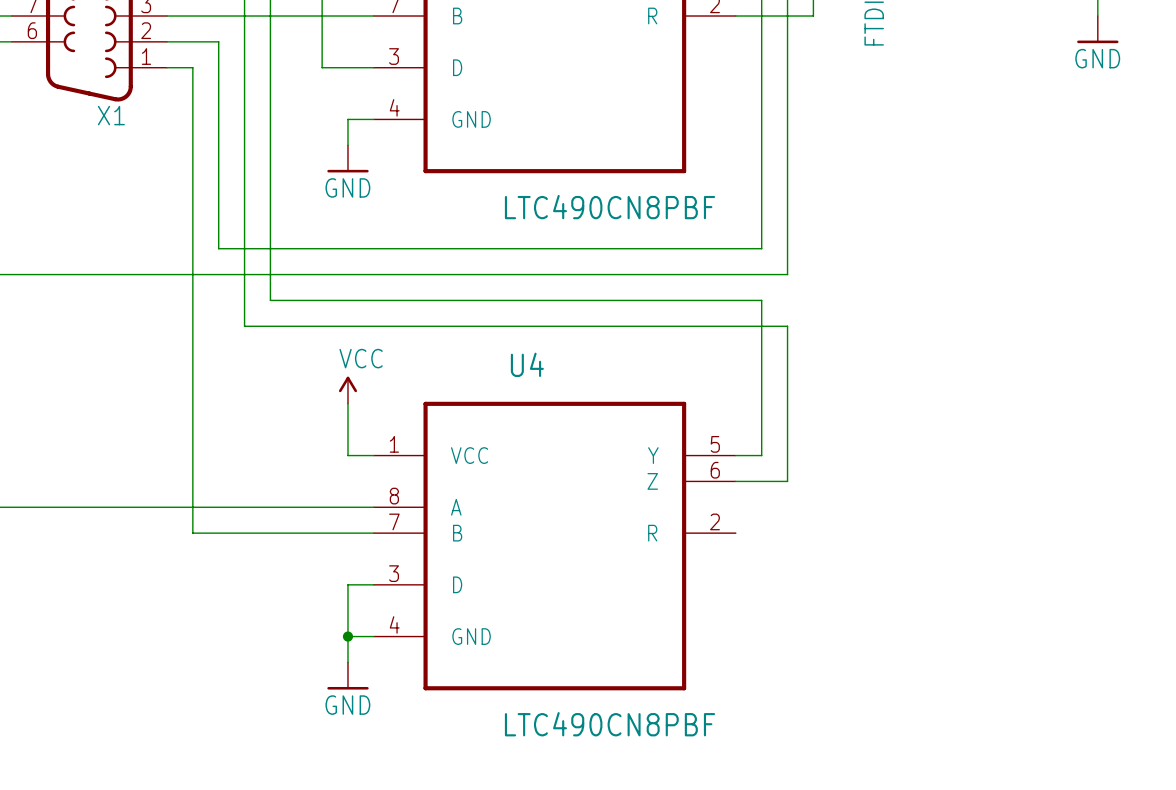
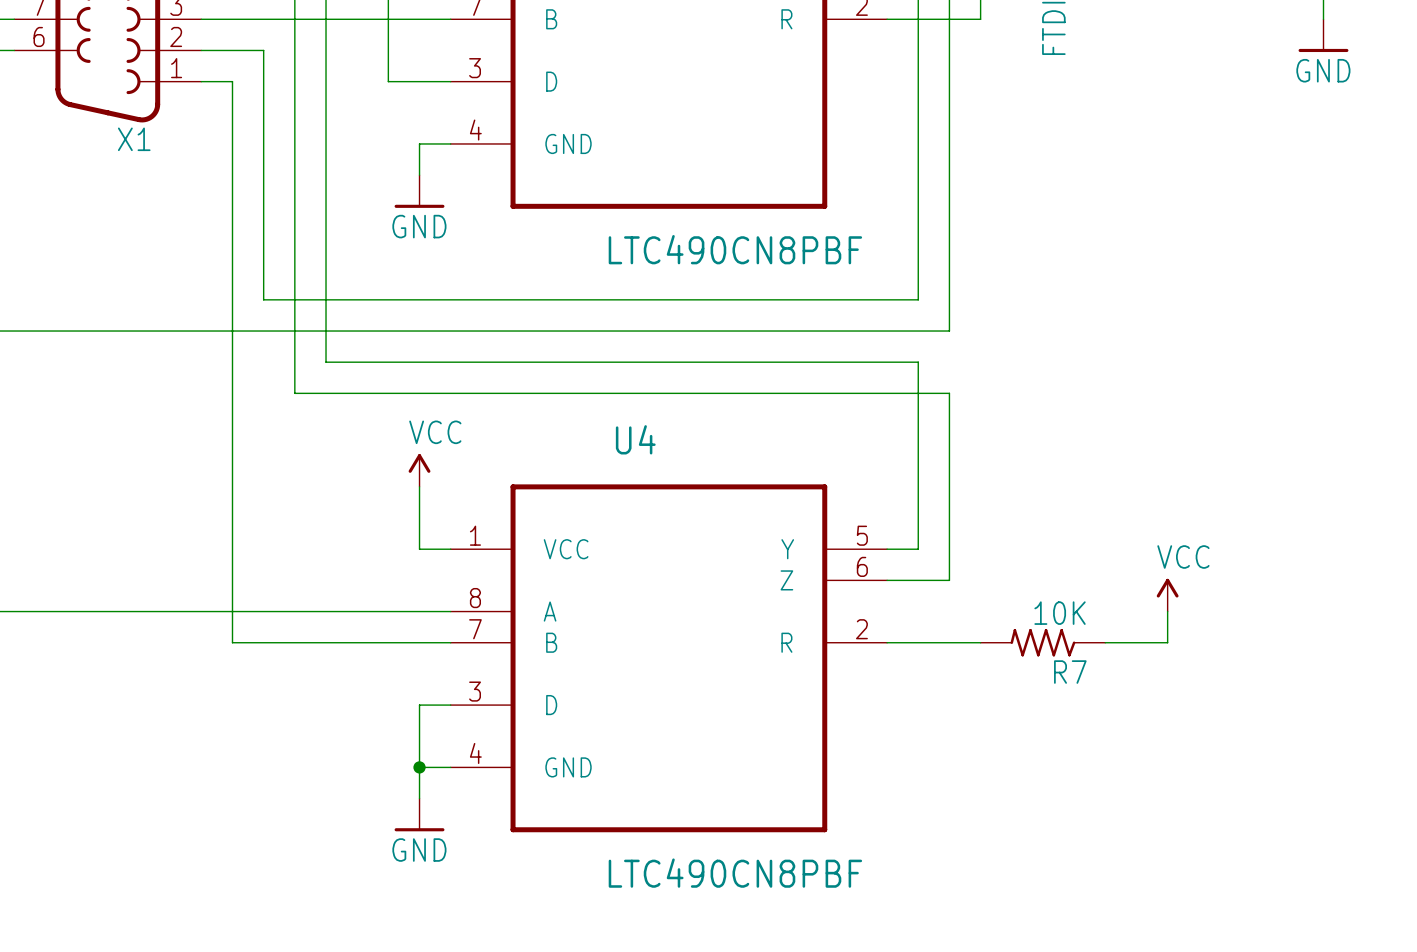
power symbol: none -> VCC (1167, 595)
wire: none -> (1167, 611) (1167, 642) (1105, 642)
wire: none -> (887, 642) (980, 642)
R7: none -> 10K (1042, 642)

